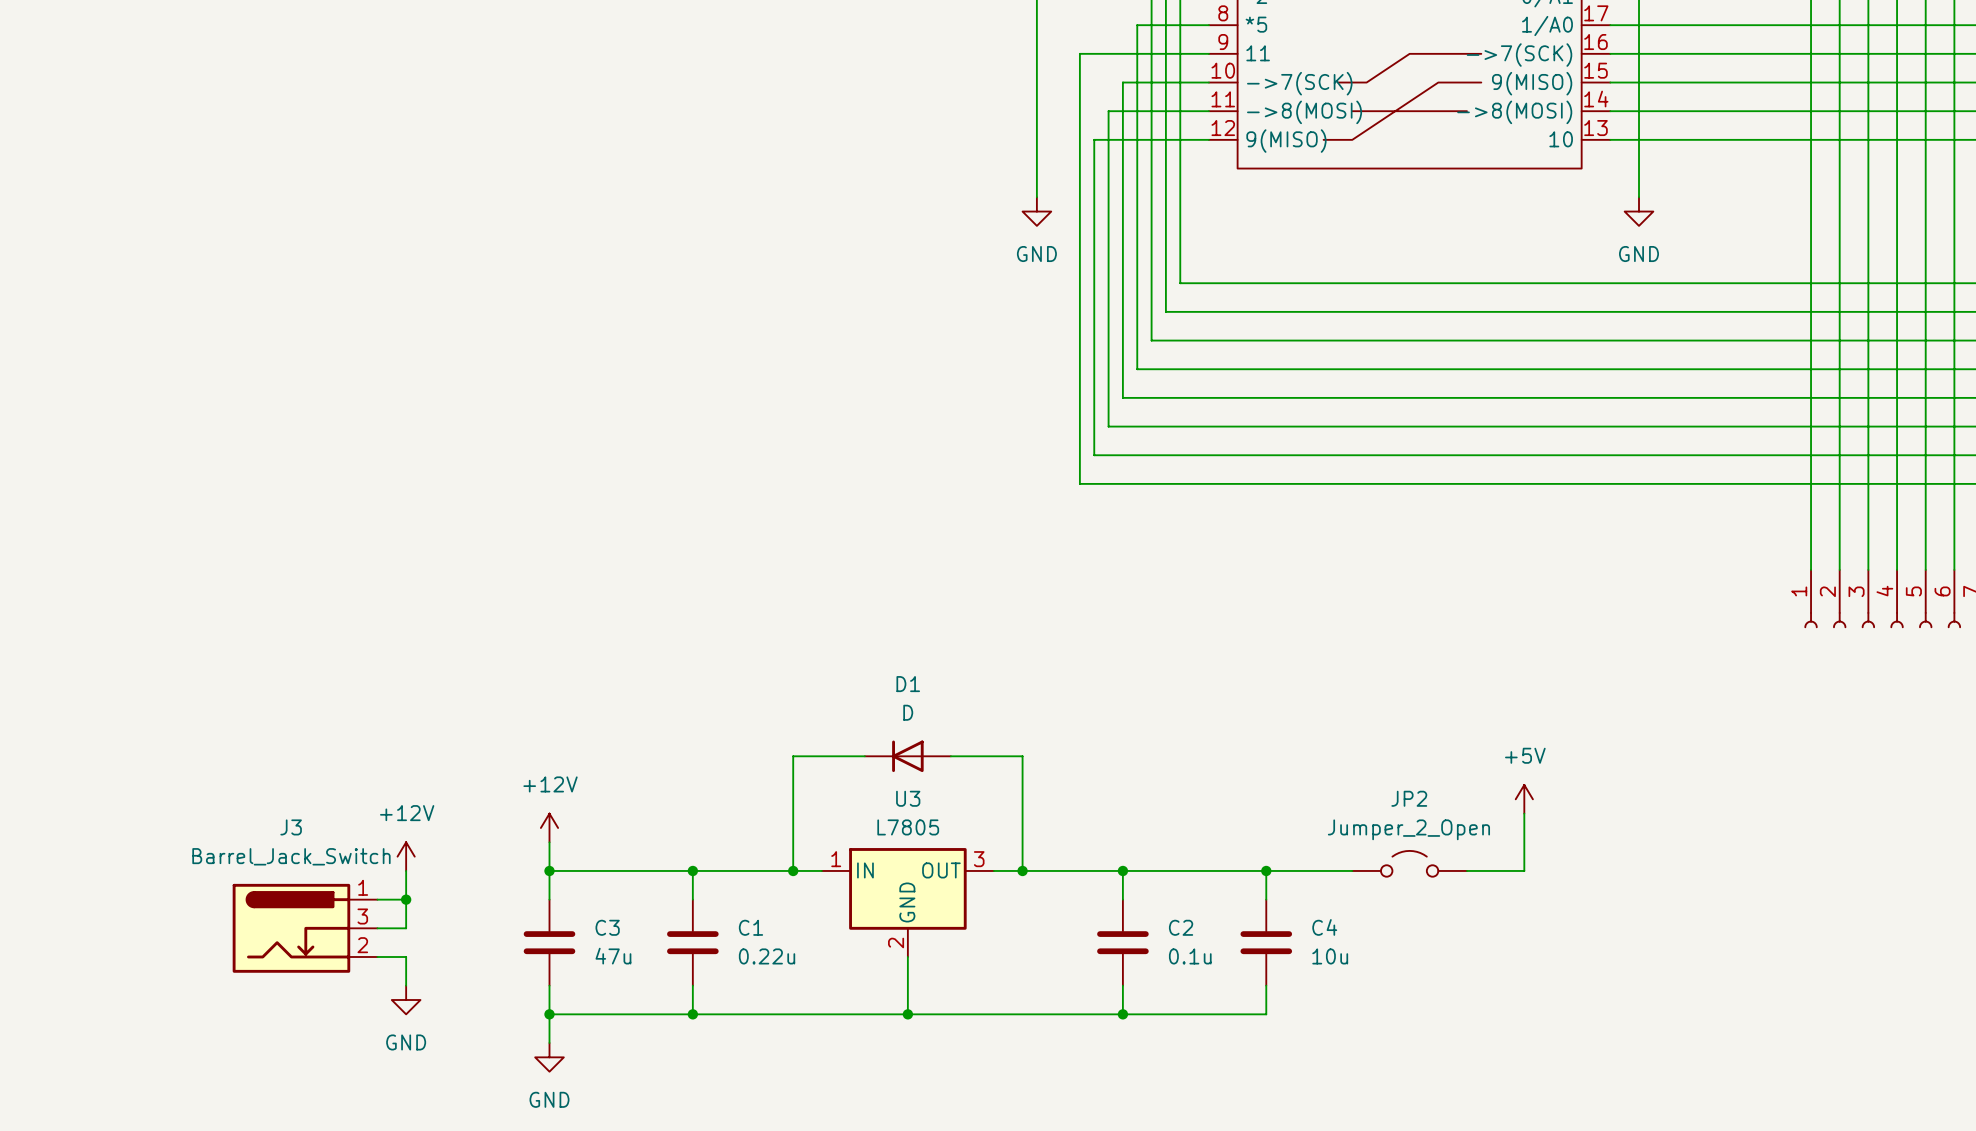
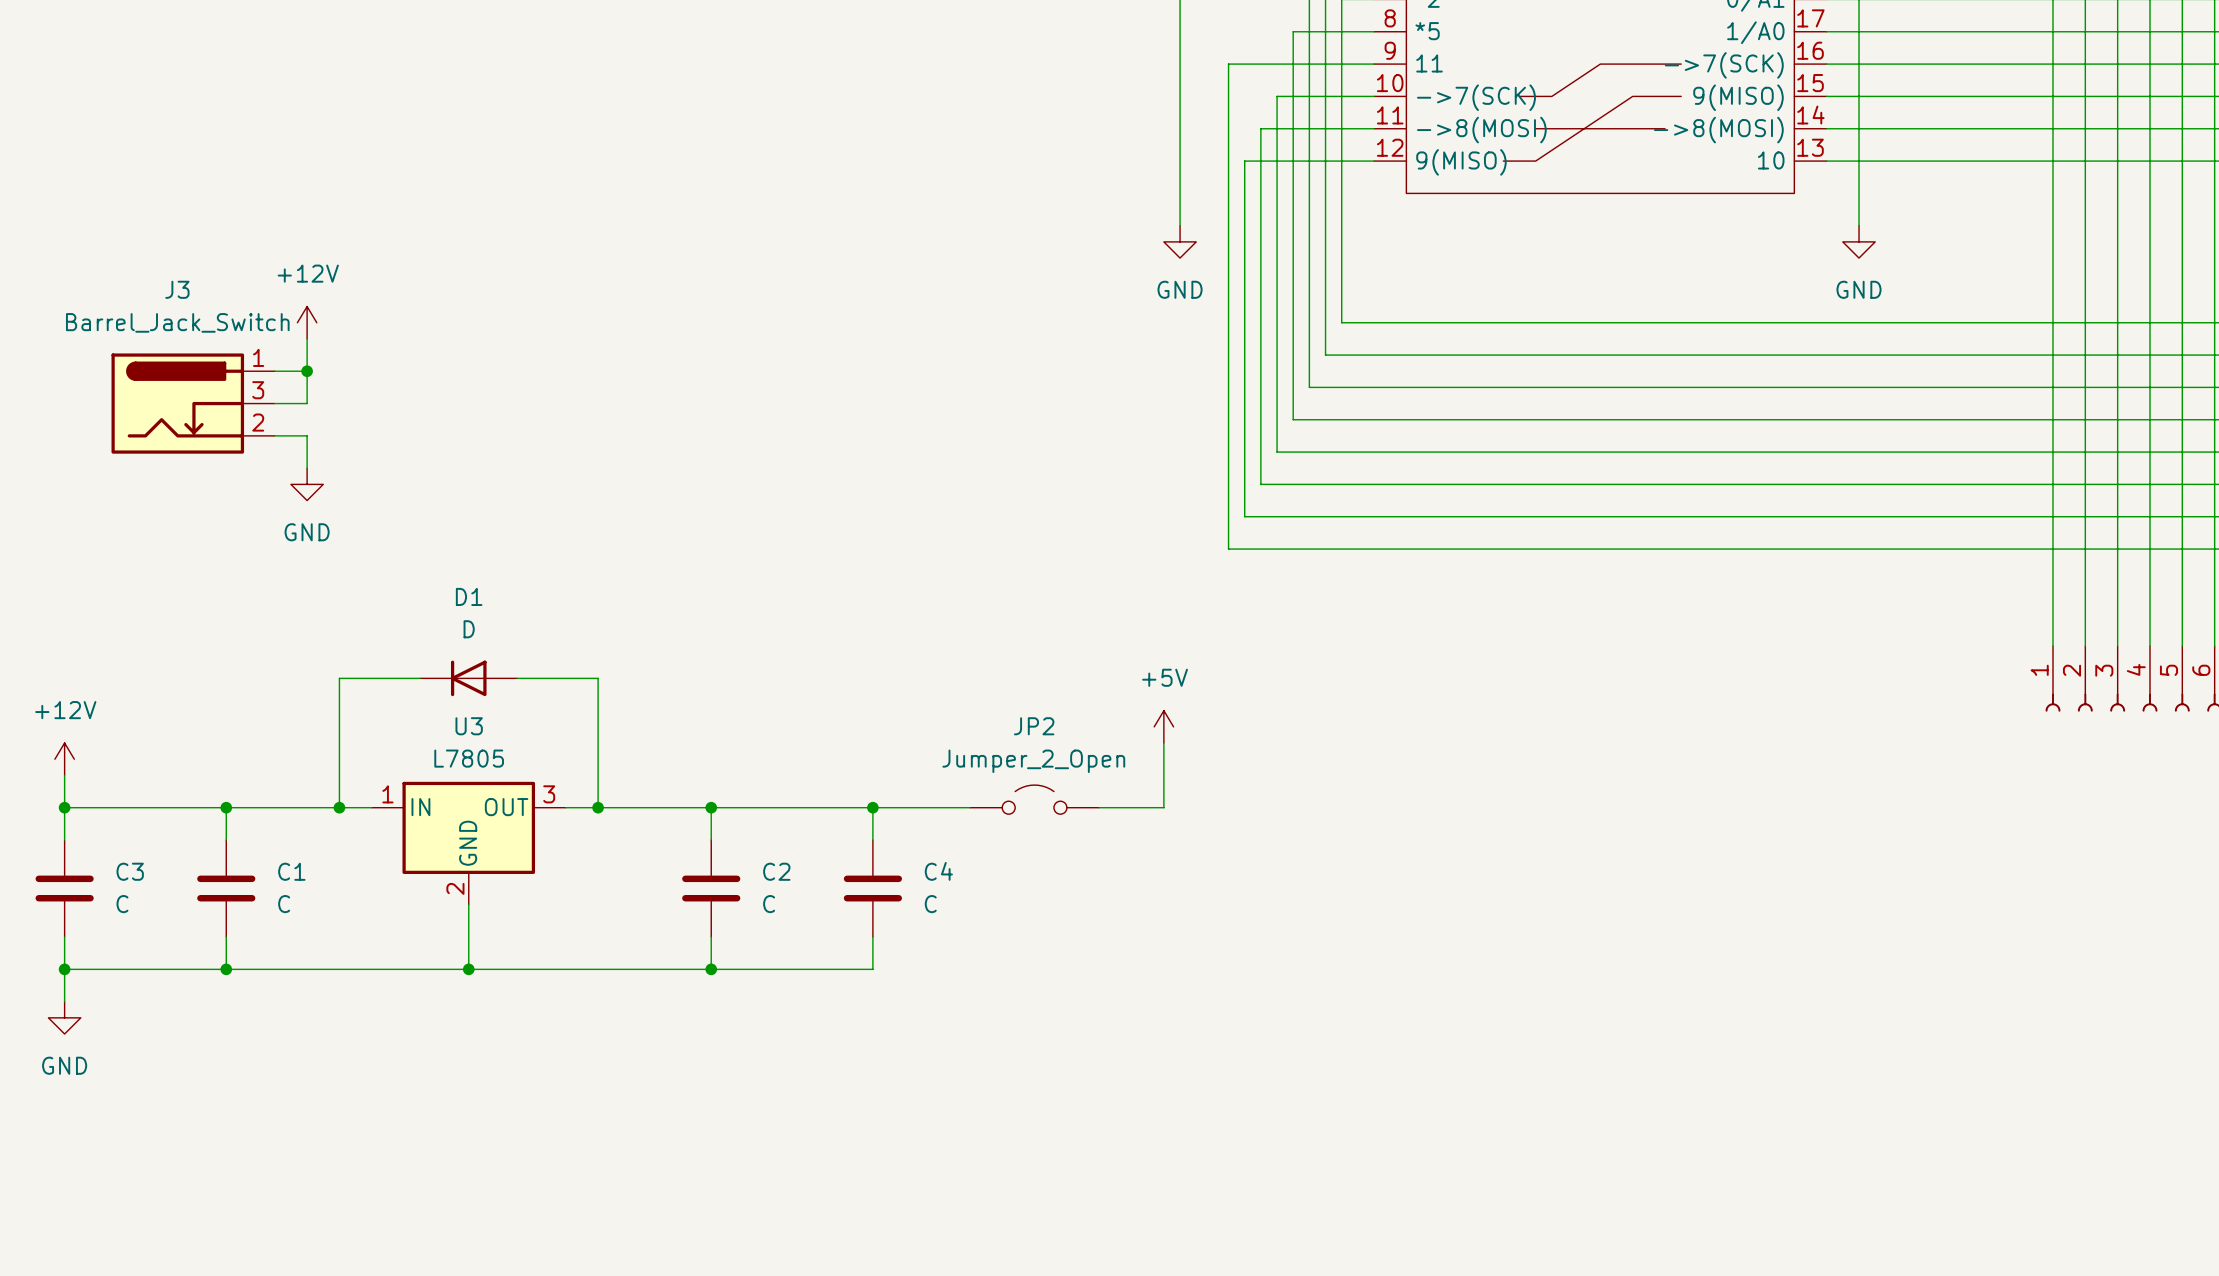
power symbol: none -> +12V (307, 322)
wire: none -> (307, 338) (307, 403) (274, 403)
wire: none -> (274, 371) (307, 371)
junction: none -> (307, 371)
wire: none -> (274, 435) (307, 435) (307, 468)
power symbol: none -> GND (307, 484)
wire: none -> (420, 678) (339, 678) (339, 807)
wire: none -> (517, 678) (598, 678) (598, 807)
power symbol: none -> +5V (1163, 726)
wire: none -> (1163, 743) (1163, 807) (1099, 807)
power symbol: none -> +12V (64, 759)
wire: none -> (64, 775) (64, 840)
wire: none -> (64, 807) (371, 807)
junction: none -> (64, 807)
wire: none -> (226, 807) (226, 840)
junction: none -> (226, 807)
junction: none -> (339, 807)
wire: none -> (565, 807) (969, 807)
junction: none -> (598, 807)
junction: none -> (711, 807)
wire: none -> (872, 807) (872, 840)
junction: none -> (872, 807)
wire: (864, 756) (793, 756) (793, 870) -> none
D1 position: (907, 756) -> (468, 678)
wire: (950, 756) (1022, 756) (1022, 870) -> none
power symbol: +5V (1524, 799) -> none
wire: (1524, 813) (1524, 870) (1466, 870) -> none
wire: none -> (64, 937) (64, 1001)
wire: none -> (226, 937) (226, 969)
power symbol: +12V (549, 827) -> none
wire: none -> (872, 937) (872, 969) (64, 969)
wire: (549, 842) (549, 899) -> (468, 904) (468, 969)
junction: none -> (64, 969)
junction: none -> (226, 969)
power symbol: +12V (406, 856) -> none
junction: none -> (711, 969)
JP2 position: (1409, 863) -> (1034, 799)
wire: (406, 870) (406, 928) (377, 928) -> none
wire: (549, 870) (821, 870) -> none
junction: (549, 870) -> none
wire: (692, 870) (692, 899) -> (711, 807) (711, 840)
junction: (692, 870) -> none
junction: (793, 870) -> none
wire: (993, 870) (1352, 870) -> none
junction: (1022, 870) -> none
wire: (1122, 870) (1122, 899) -> none
junction: (1122, 870) -> none
wire: (1266, 870) (1266, 899) -> none
junction: (1266, 870) -> none
power symbol: none -> GND (64, 1017)
wire: (377, 899) (406, 899) -> none
junction position: (406, 899) -> (468, 969)
U3 position: (907, 902) -> (468, 843)
J3 position: (305, 928) -> (193, 403)
C3 position: (549, 942) -> (64, 888)
C1 position: (692, 942) -> (226, 888)
C2 position: (1122, 942) -> (711, 888)
C4 position: (1266, 942) -> (872, 888)
wire: (377, 956) (406, 956) (406, 985) -> none
C3 value: 47u (613, 956) -> C (122, 904)
C1 value: 0.22u (767, 956) -> C (284, 904)
wire: (907, 956) (907, 1014) -> none
C2 value: 0.1u (1190, 956) -> C (769, 904)
C4 value: 10u (1330, 956) -> C (930, 904)
wire: (549, 985) (549, 1043) -> none
wire: (692, 985) (692, 1014) -> (711, 937) (711, 969)
wire: (1122, 985) (1122, 1014) -> none
wire: (1266, 985) (1266, 1014) (549, 1014) -> none
power symbol: GND (406, 1000) -> none
junction: (549, 1014) -> none
junction: (692, 1014) -> none
junction: (907, 1014) -> none
junction: (1122, 1014) -> none
power symbol: GND (549, 1057) -> none

